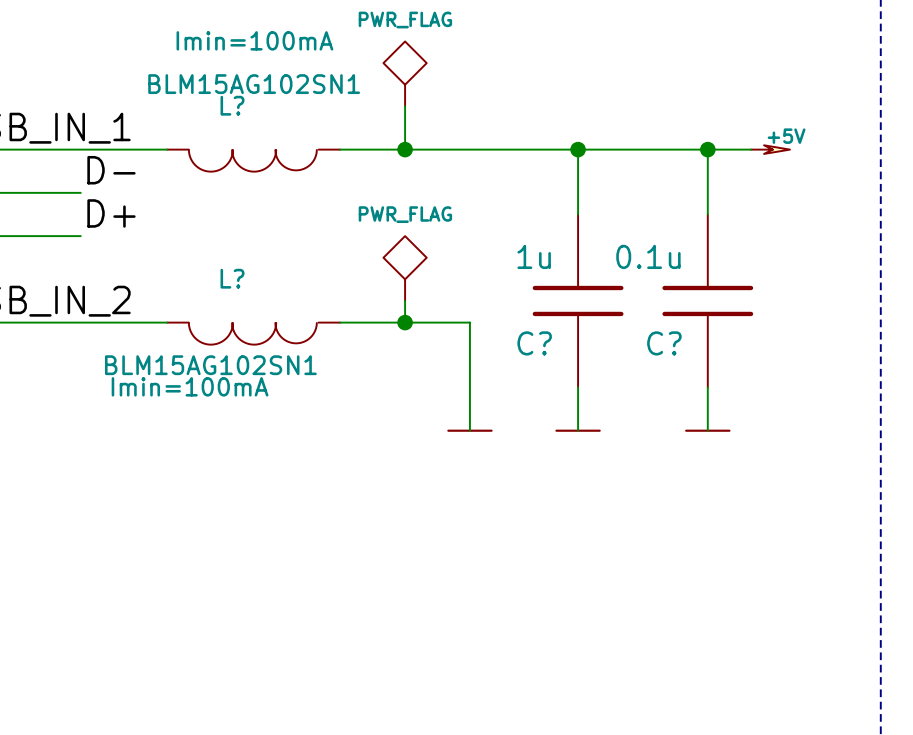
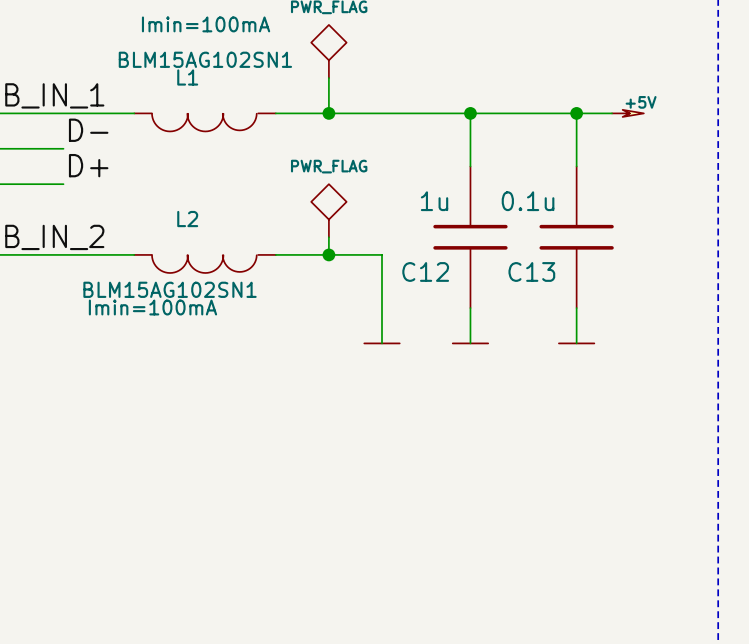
L? name: L? (232, 105) -> L1 (187, 77)
L? name: L? (232, 278) -> L2 (187, 219)
C? name: C? (534, 343) -> C12 (425, 271)
C? name: C? (664, 343) -> C13 (531, 271)

